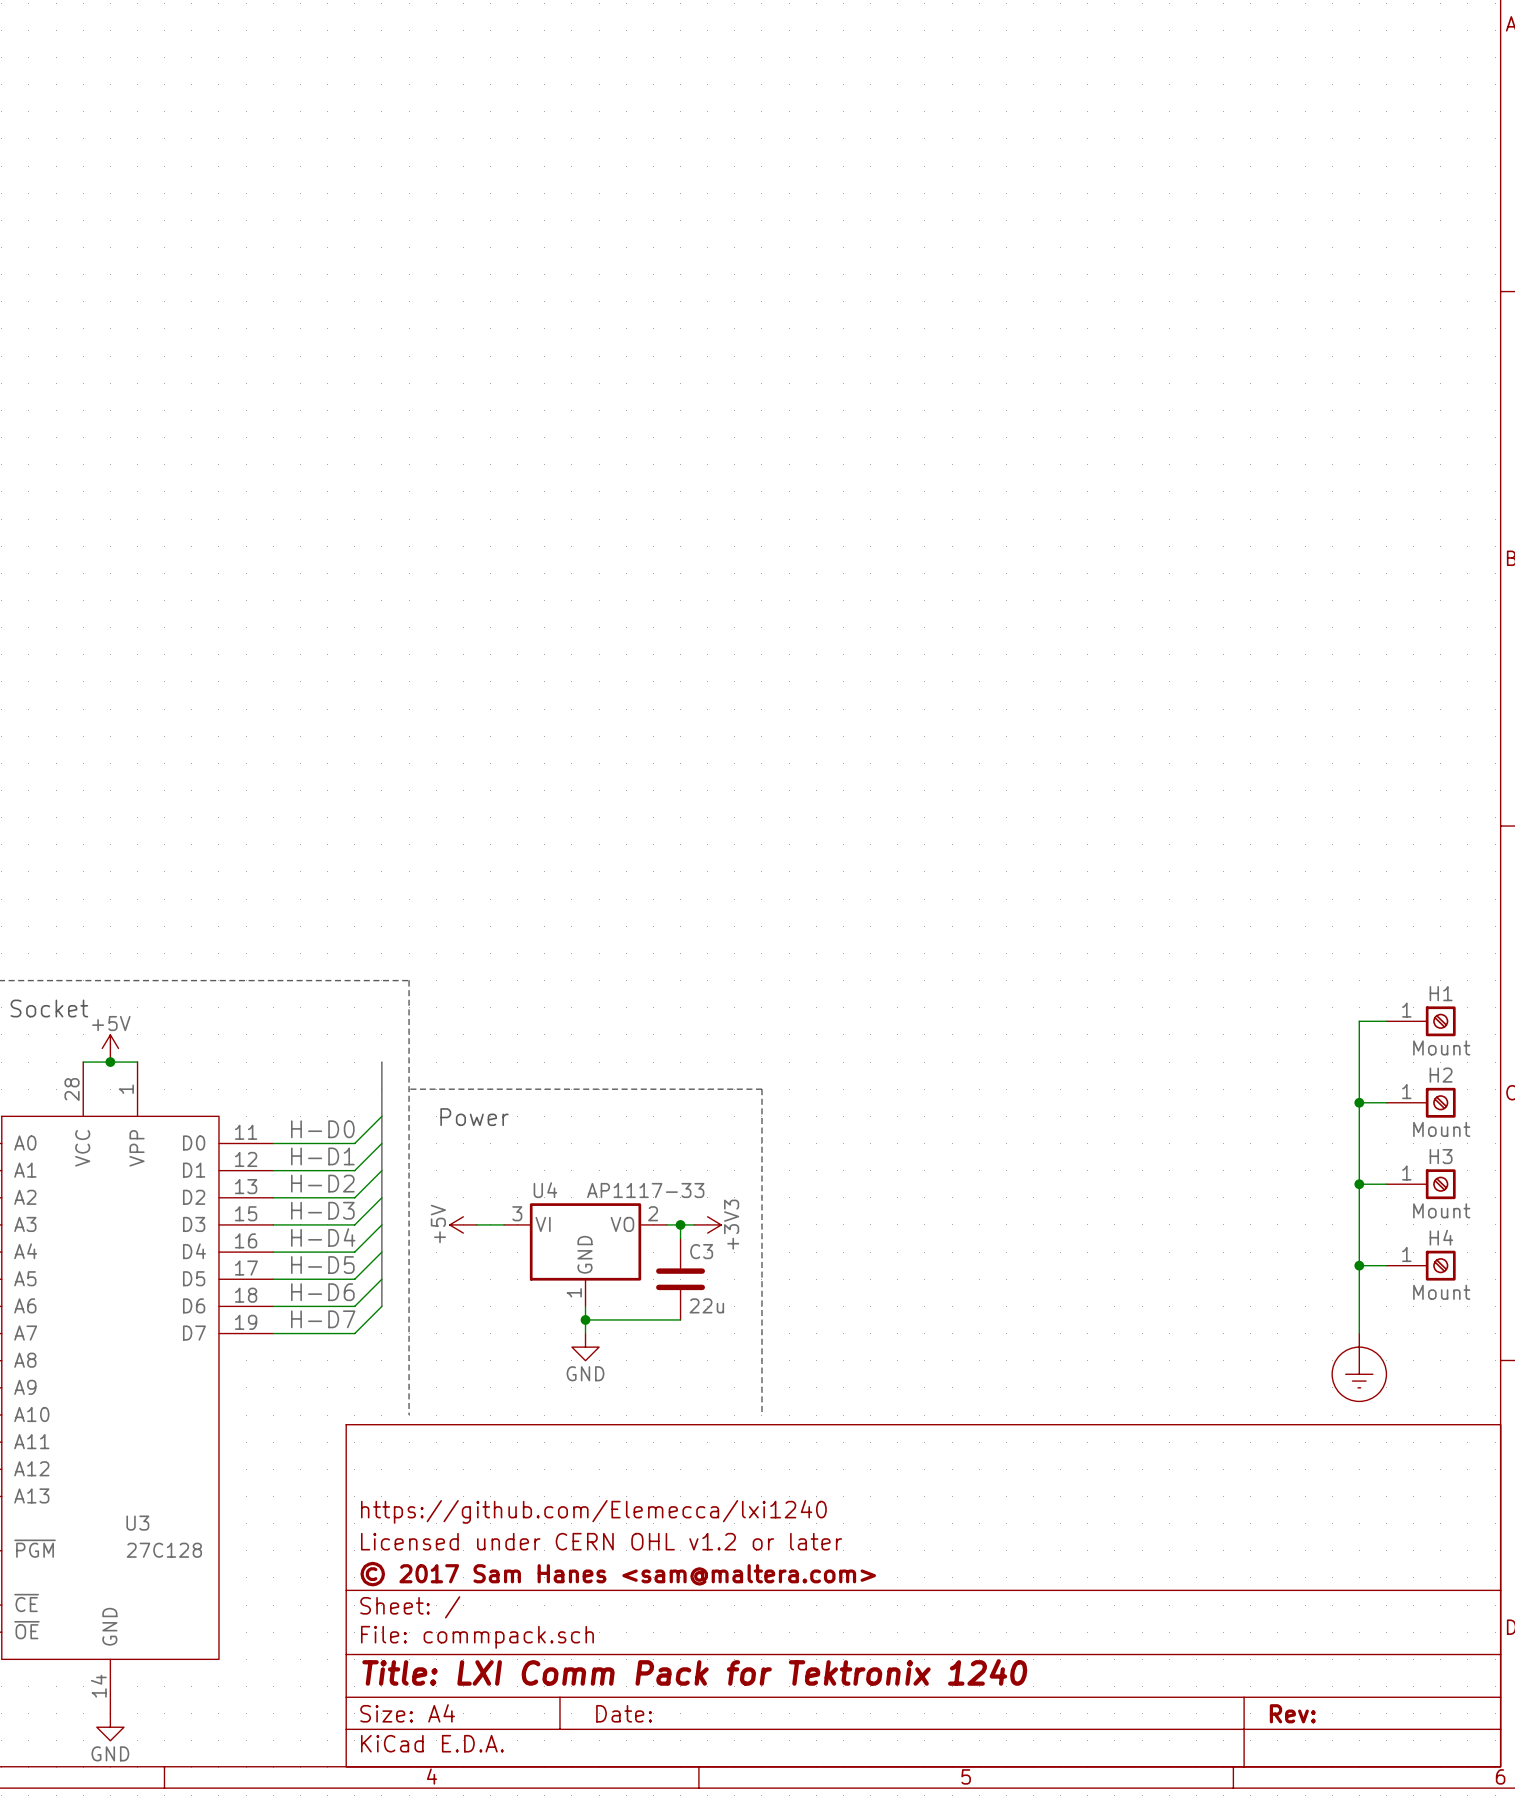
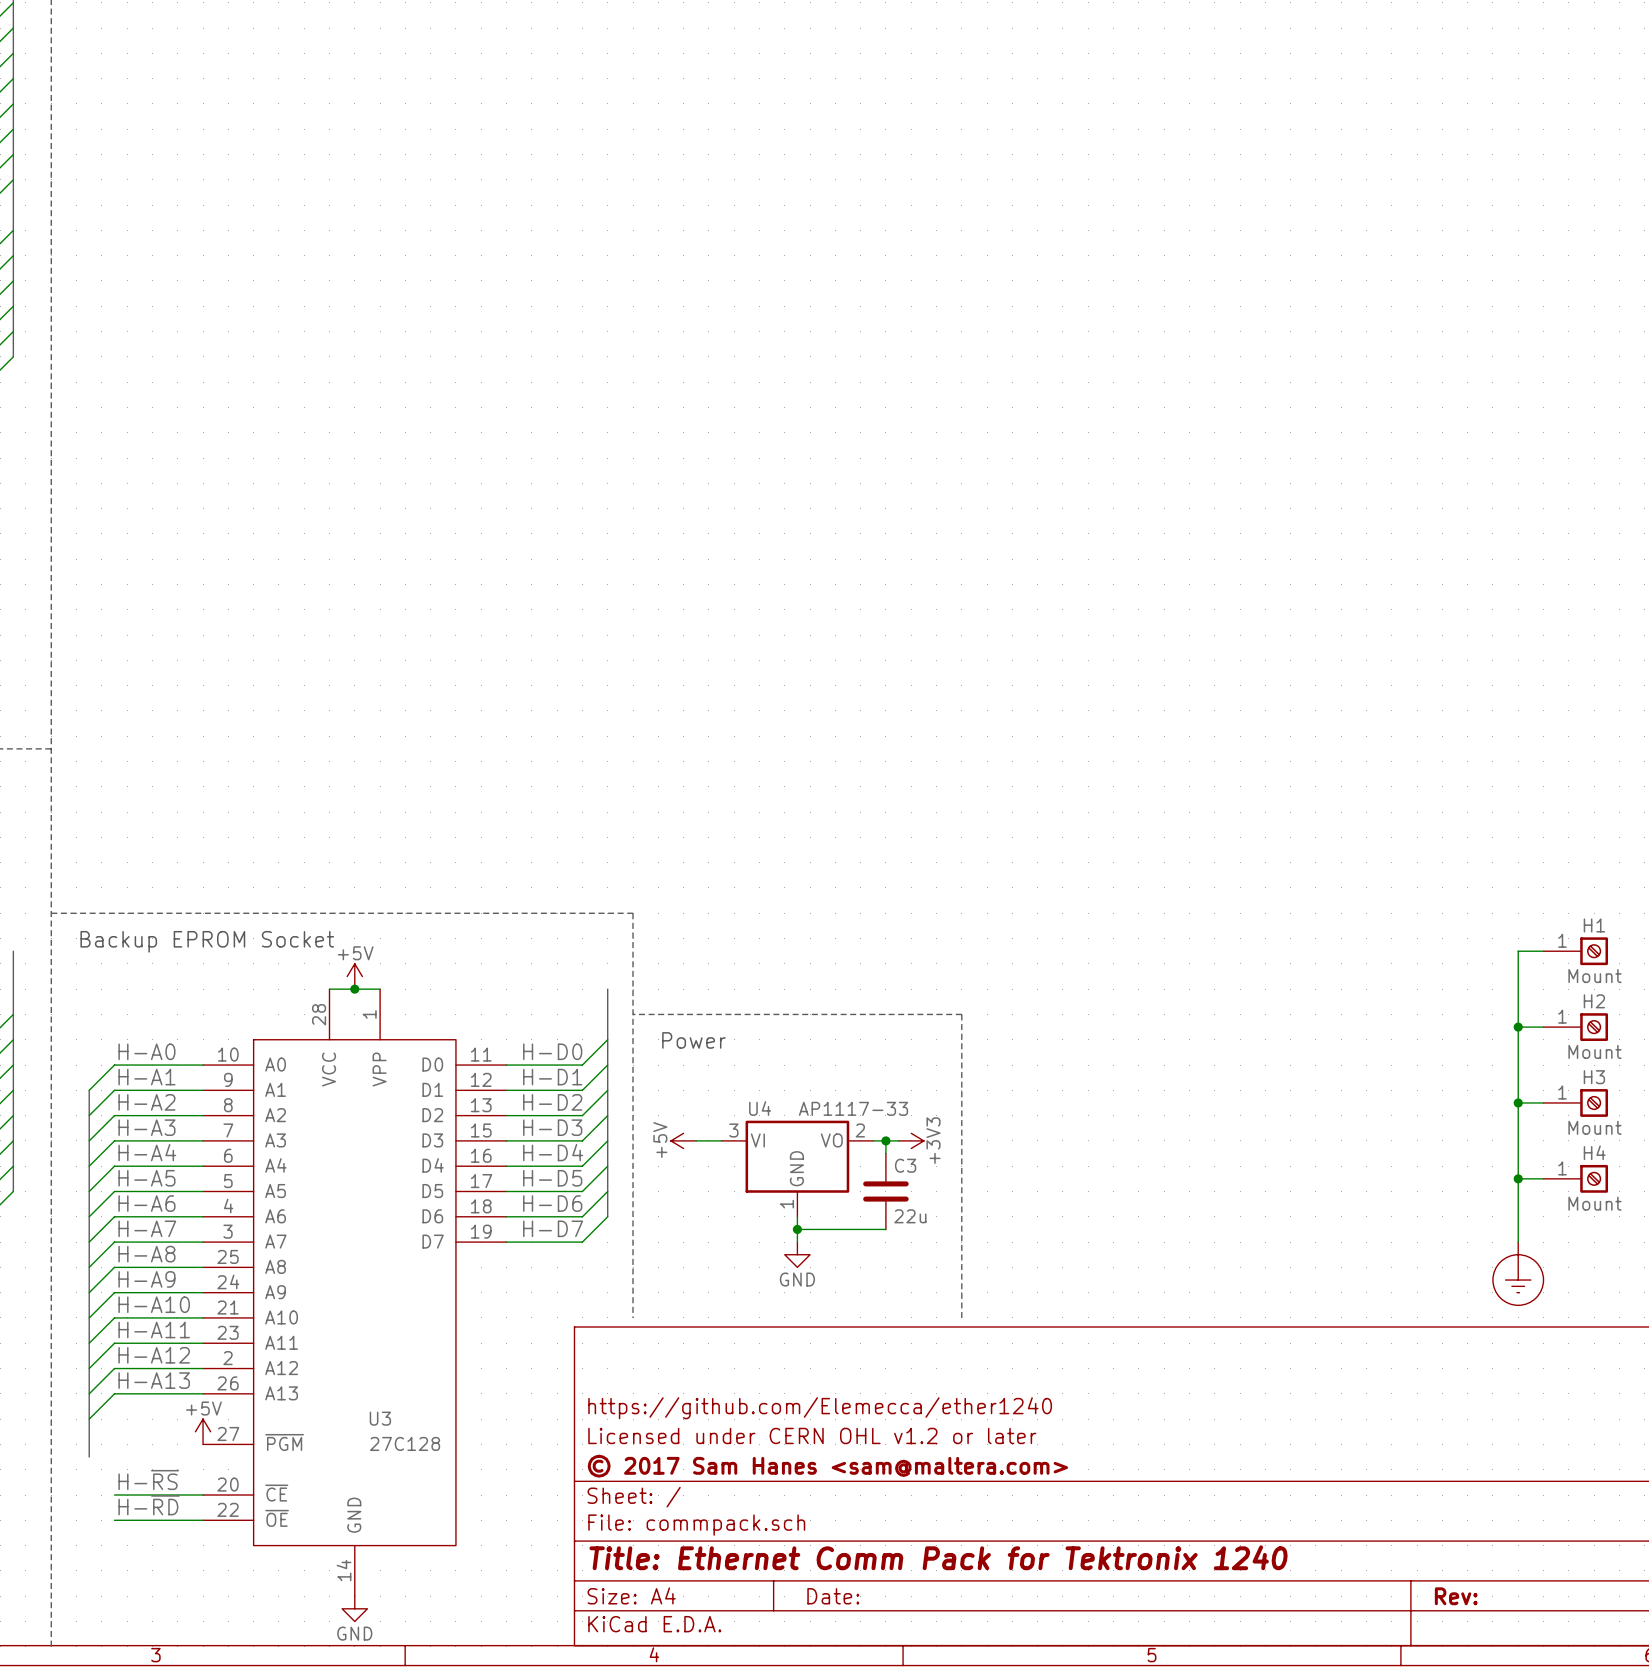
title block: https://github.com/Elemecca/lxi1240 (593, 1511) -> https://github.com/Elemecca/ether1240 (820, 1408)
title block: Title: LXI Comm Pack for Tektronix 1240 (694, 1672) -> Title: Ethernet Comm Pack for Tektronix 1240 (938, 1557)

